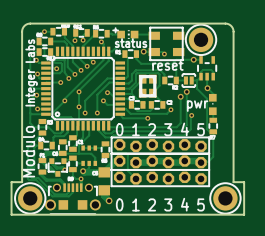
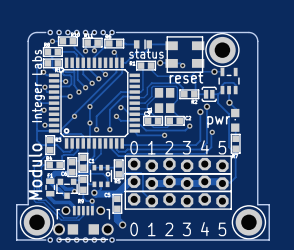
part footprint: [11, 23, 245, 216] -> [16, 30, 270, 243]
part footprint: [50, 27, 68, 37] -> [58, 36, 78, 46]
part footprint: [73, 28, 90, 38] -> [82, 38, 103, 48]
part footprint: [93, 29, 110, 39] -> [104, 38, 124, 49]
part footprint: [117, 30, 139, 39] -> [133, 39, 153, 50]
part footprint: [36, 37, 54, 46] -> [43, 47, 63, 57]
part footprint: [36, 47, 54, 57] -> [43, 58, 63, 68]
part footprint: [122, 49, 140, 59] -> [136, 61, 156, 71]
part footprint: [162, 76, 179, 85] -> [179, 89, 199, 99]
part: (147, 86) -> none
part: none -> (164, 100)
part footprint: [128, 100, 146, 110] -> [143, 116, 163, 126]
part footprint: [148, 100, 166, 110] -> [165, 116, 185, 126]
part footprint: [208, 117, 218, 135] -> [231, 134, 241, 154]
part footprint: [38, 118, 47, 136] -> [45, 135, 55, 155]
part footprint: [68, 135, 78, 152] -> [78, 153, 88, 173]
part footprint: [58, 139, 68, 156] -> [67, 157, 77, 177]
part footprint: [38, 141, 55, 150] -> [45, 160, 65, 170]
part footprint: [101, 141, 110, 158] -> [114, 159, 124, 180]
part footprint: [81, 145, 98, 166] -> [90, 164, 112, 188]
part footprint: [68, 155, 78, 173] -> [78, 175, 88, 195]
part footprint: [98, 167, 111, 196] -> [112, 194, 122, 214]

